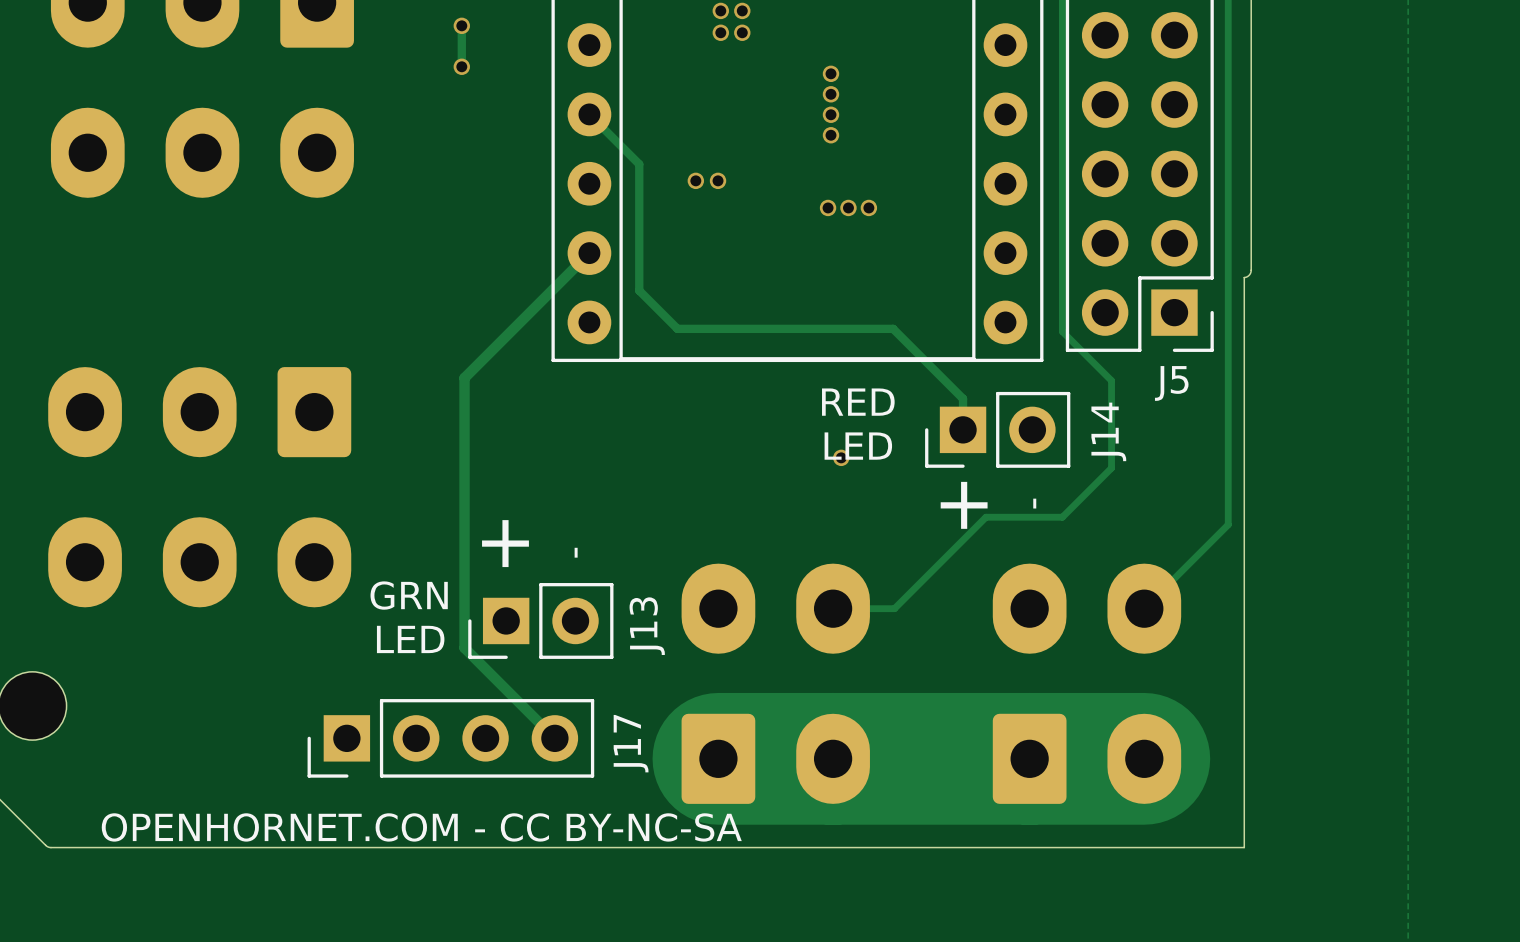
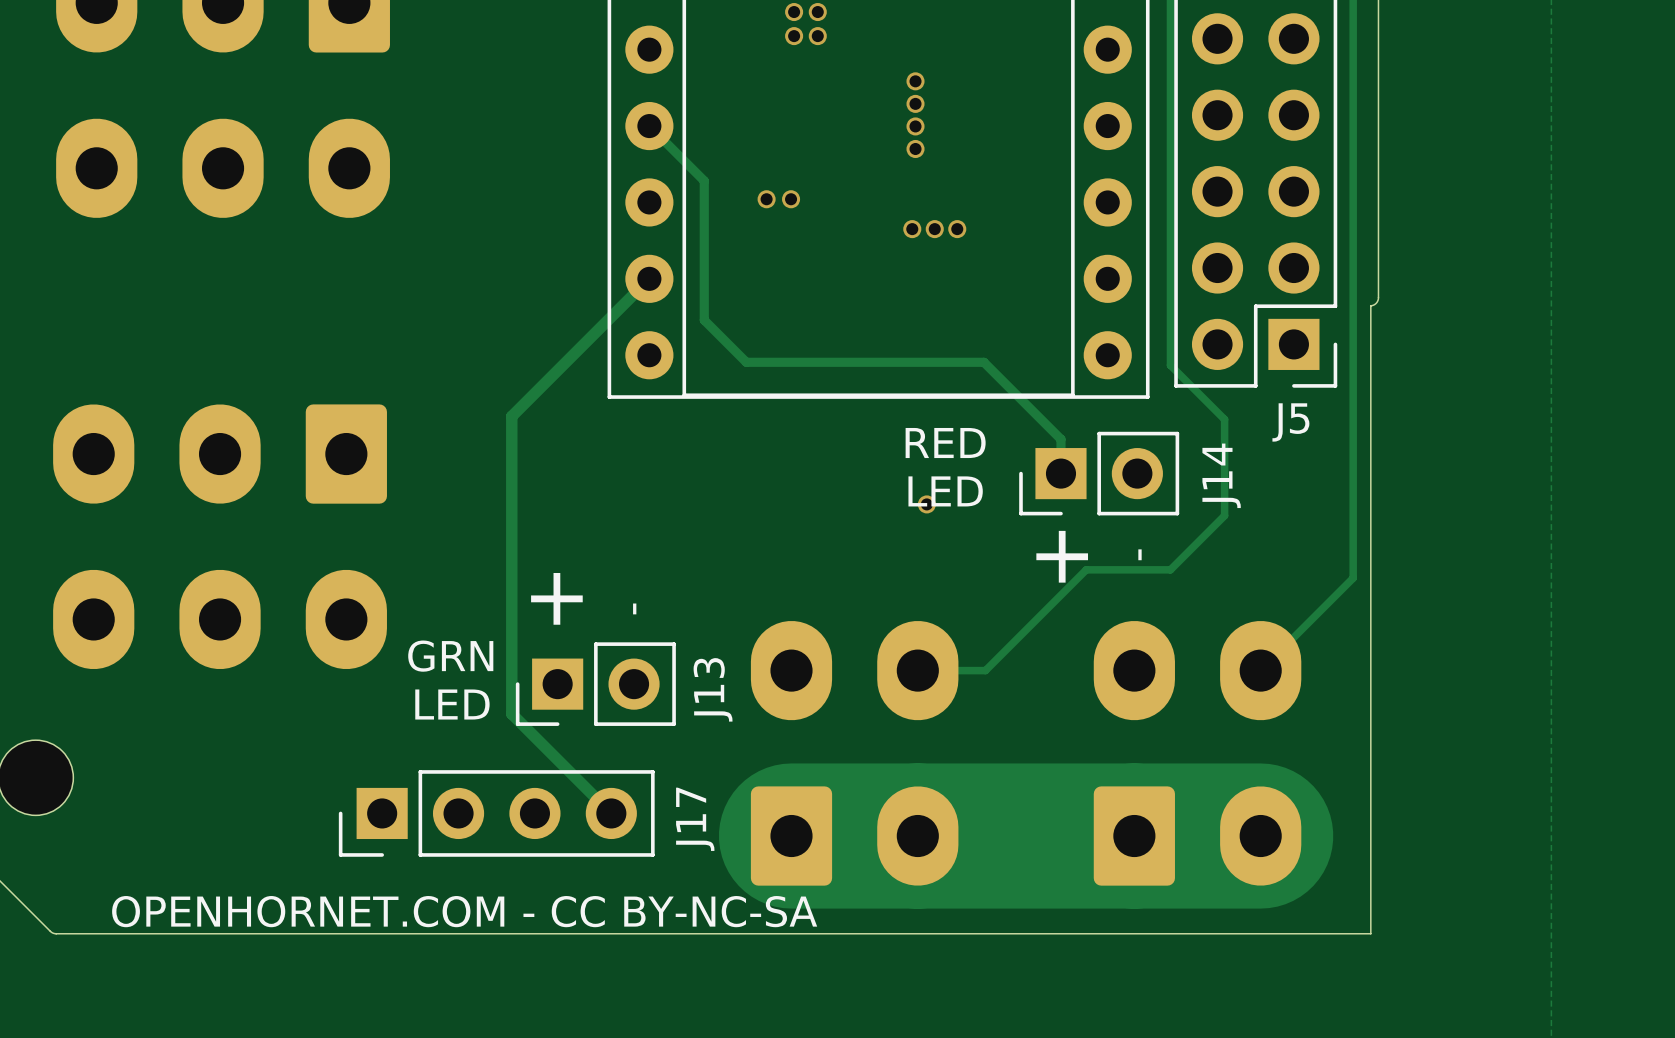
track: (461, 25) (461, 66) -> none
via: (461, 25) -> none
via: (461, 66) -> none

